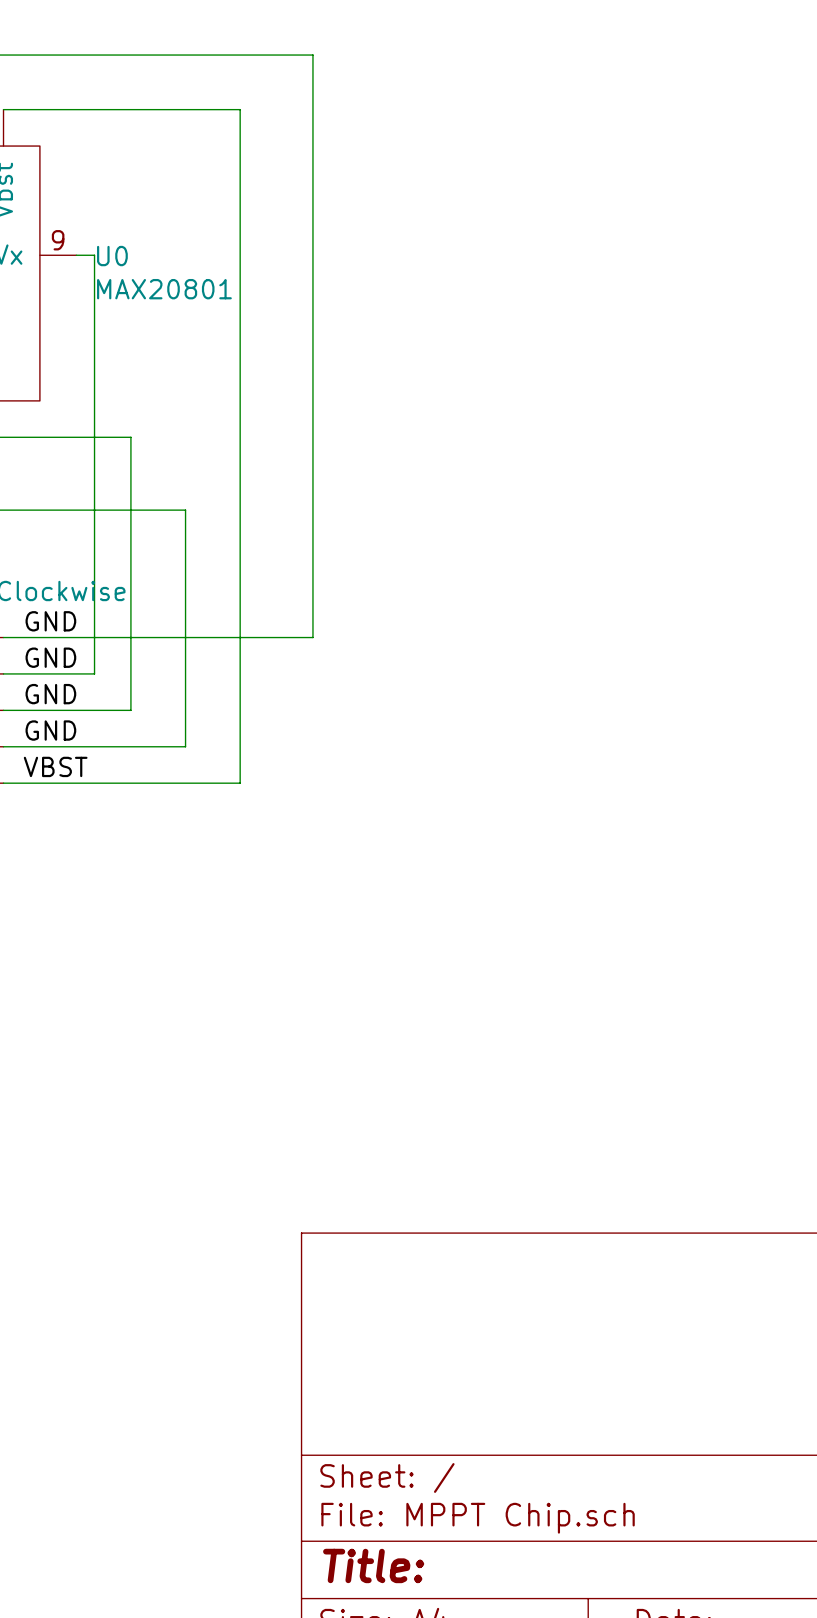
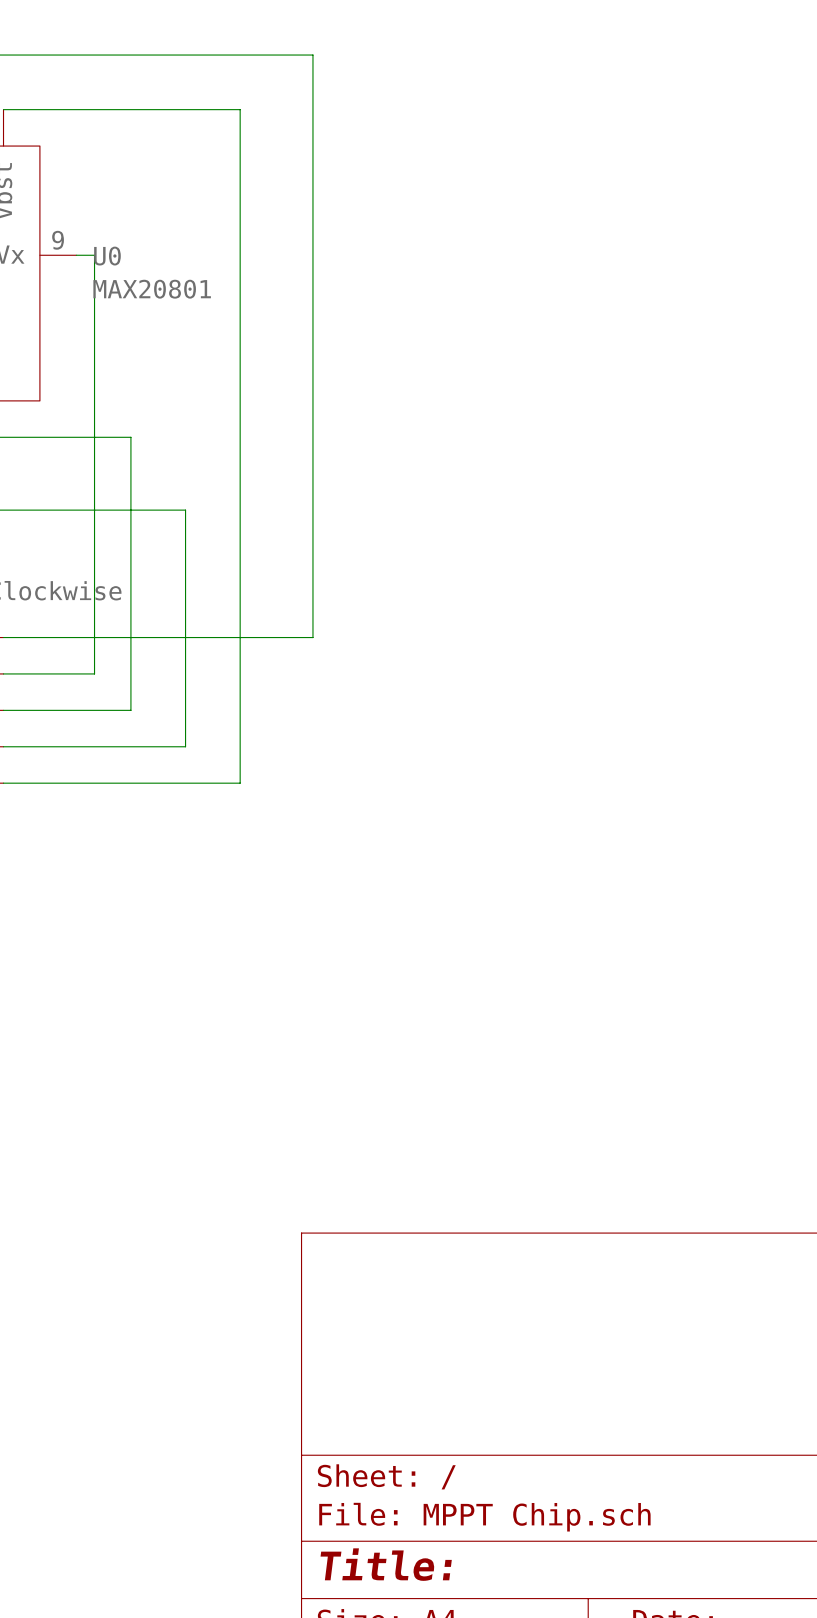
label: GND (50, 621) -> none
label: GND (50, 657) -> none
label: GND (50, 694) -> none
label: GND (50, 730) -> none
label: VBST (55, 766) -> none

